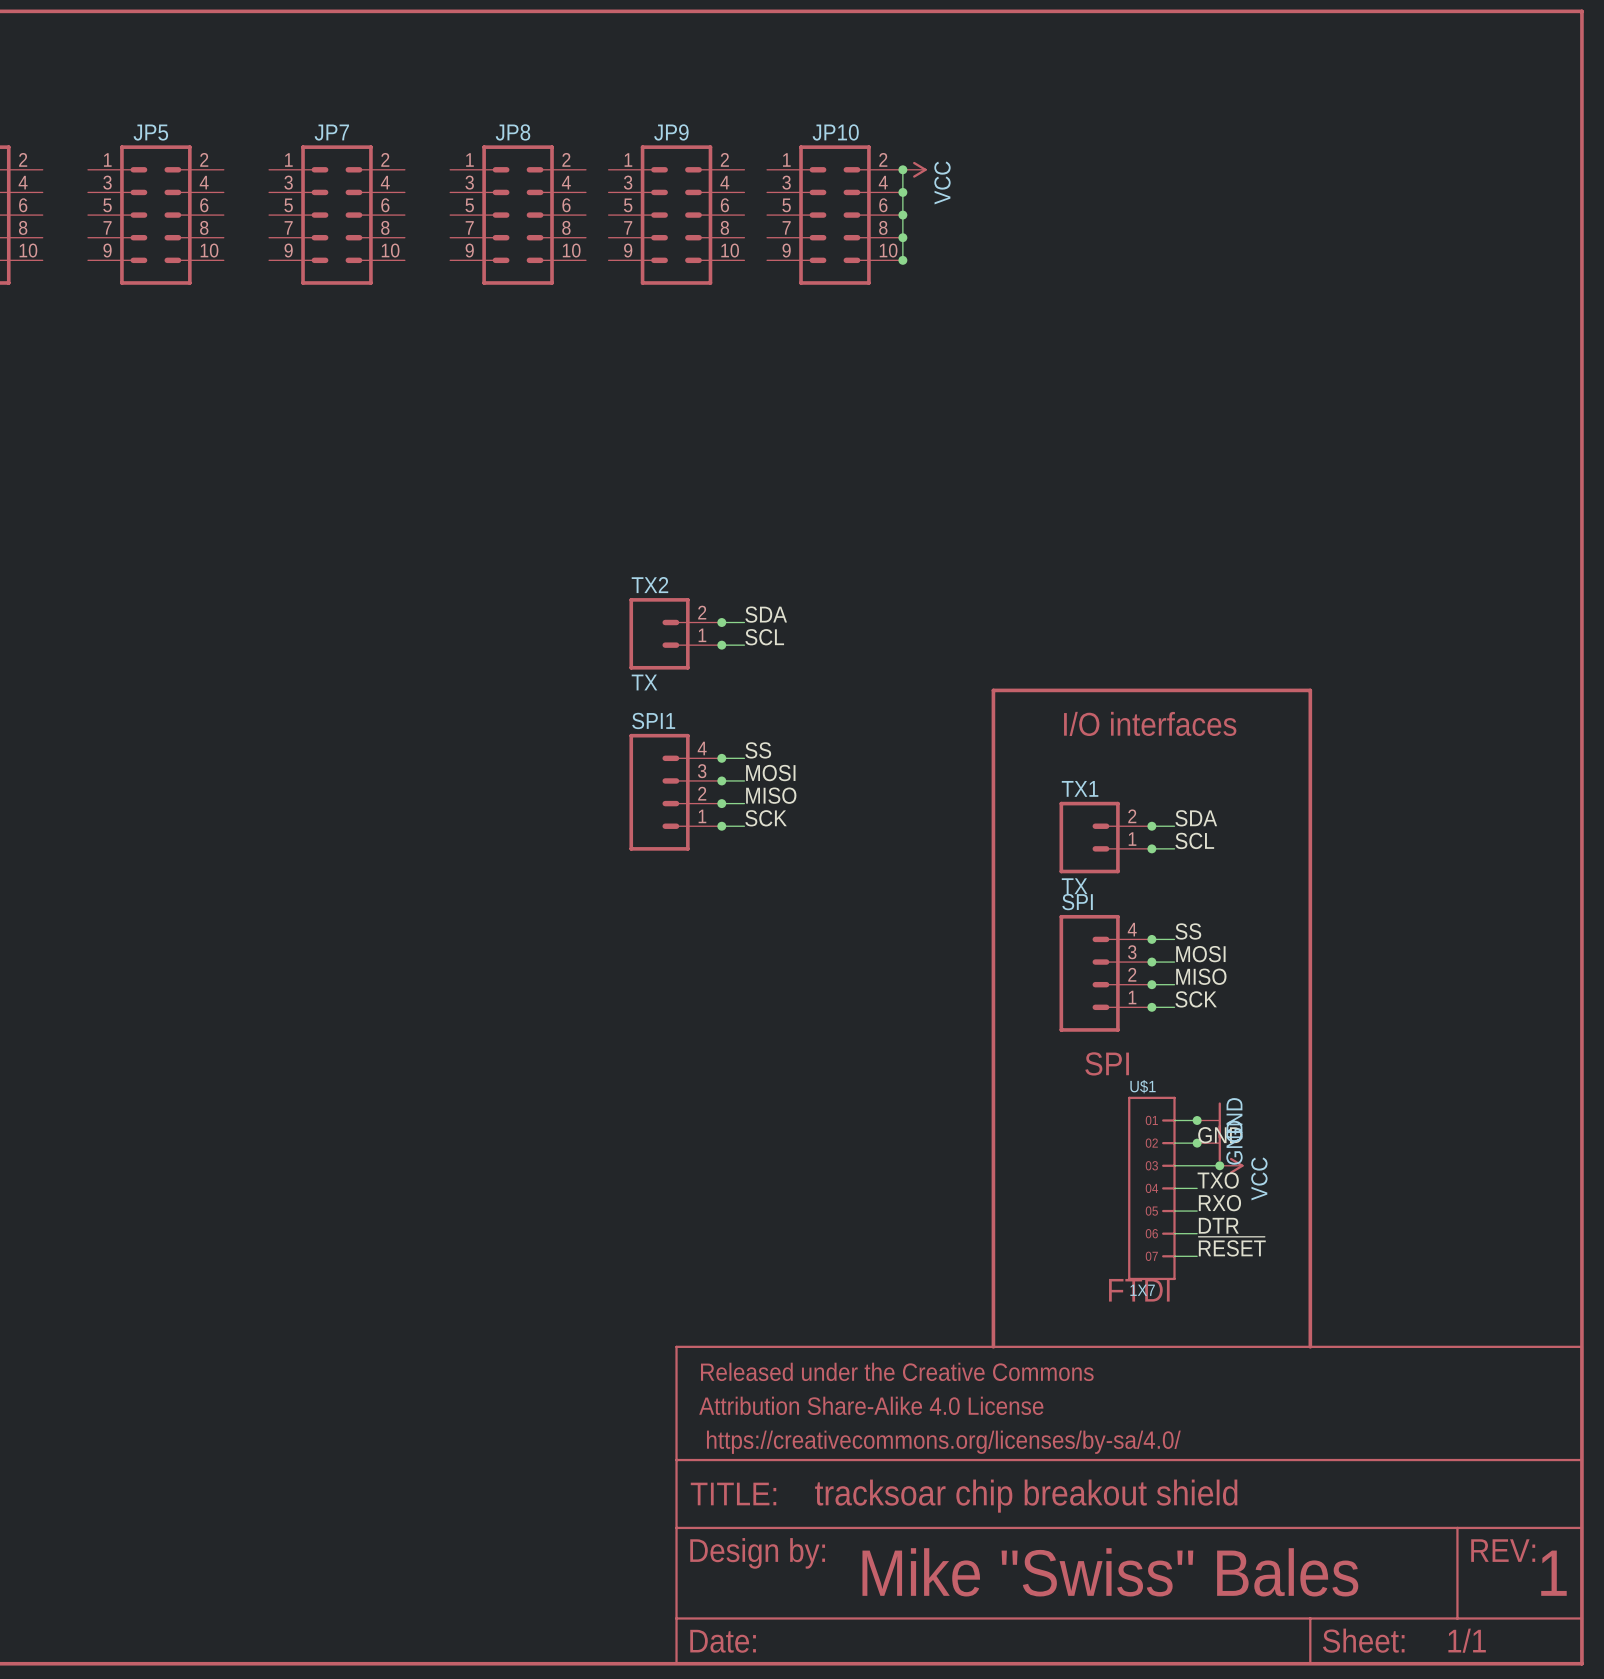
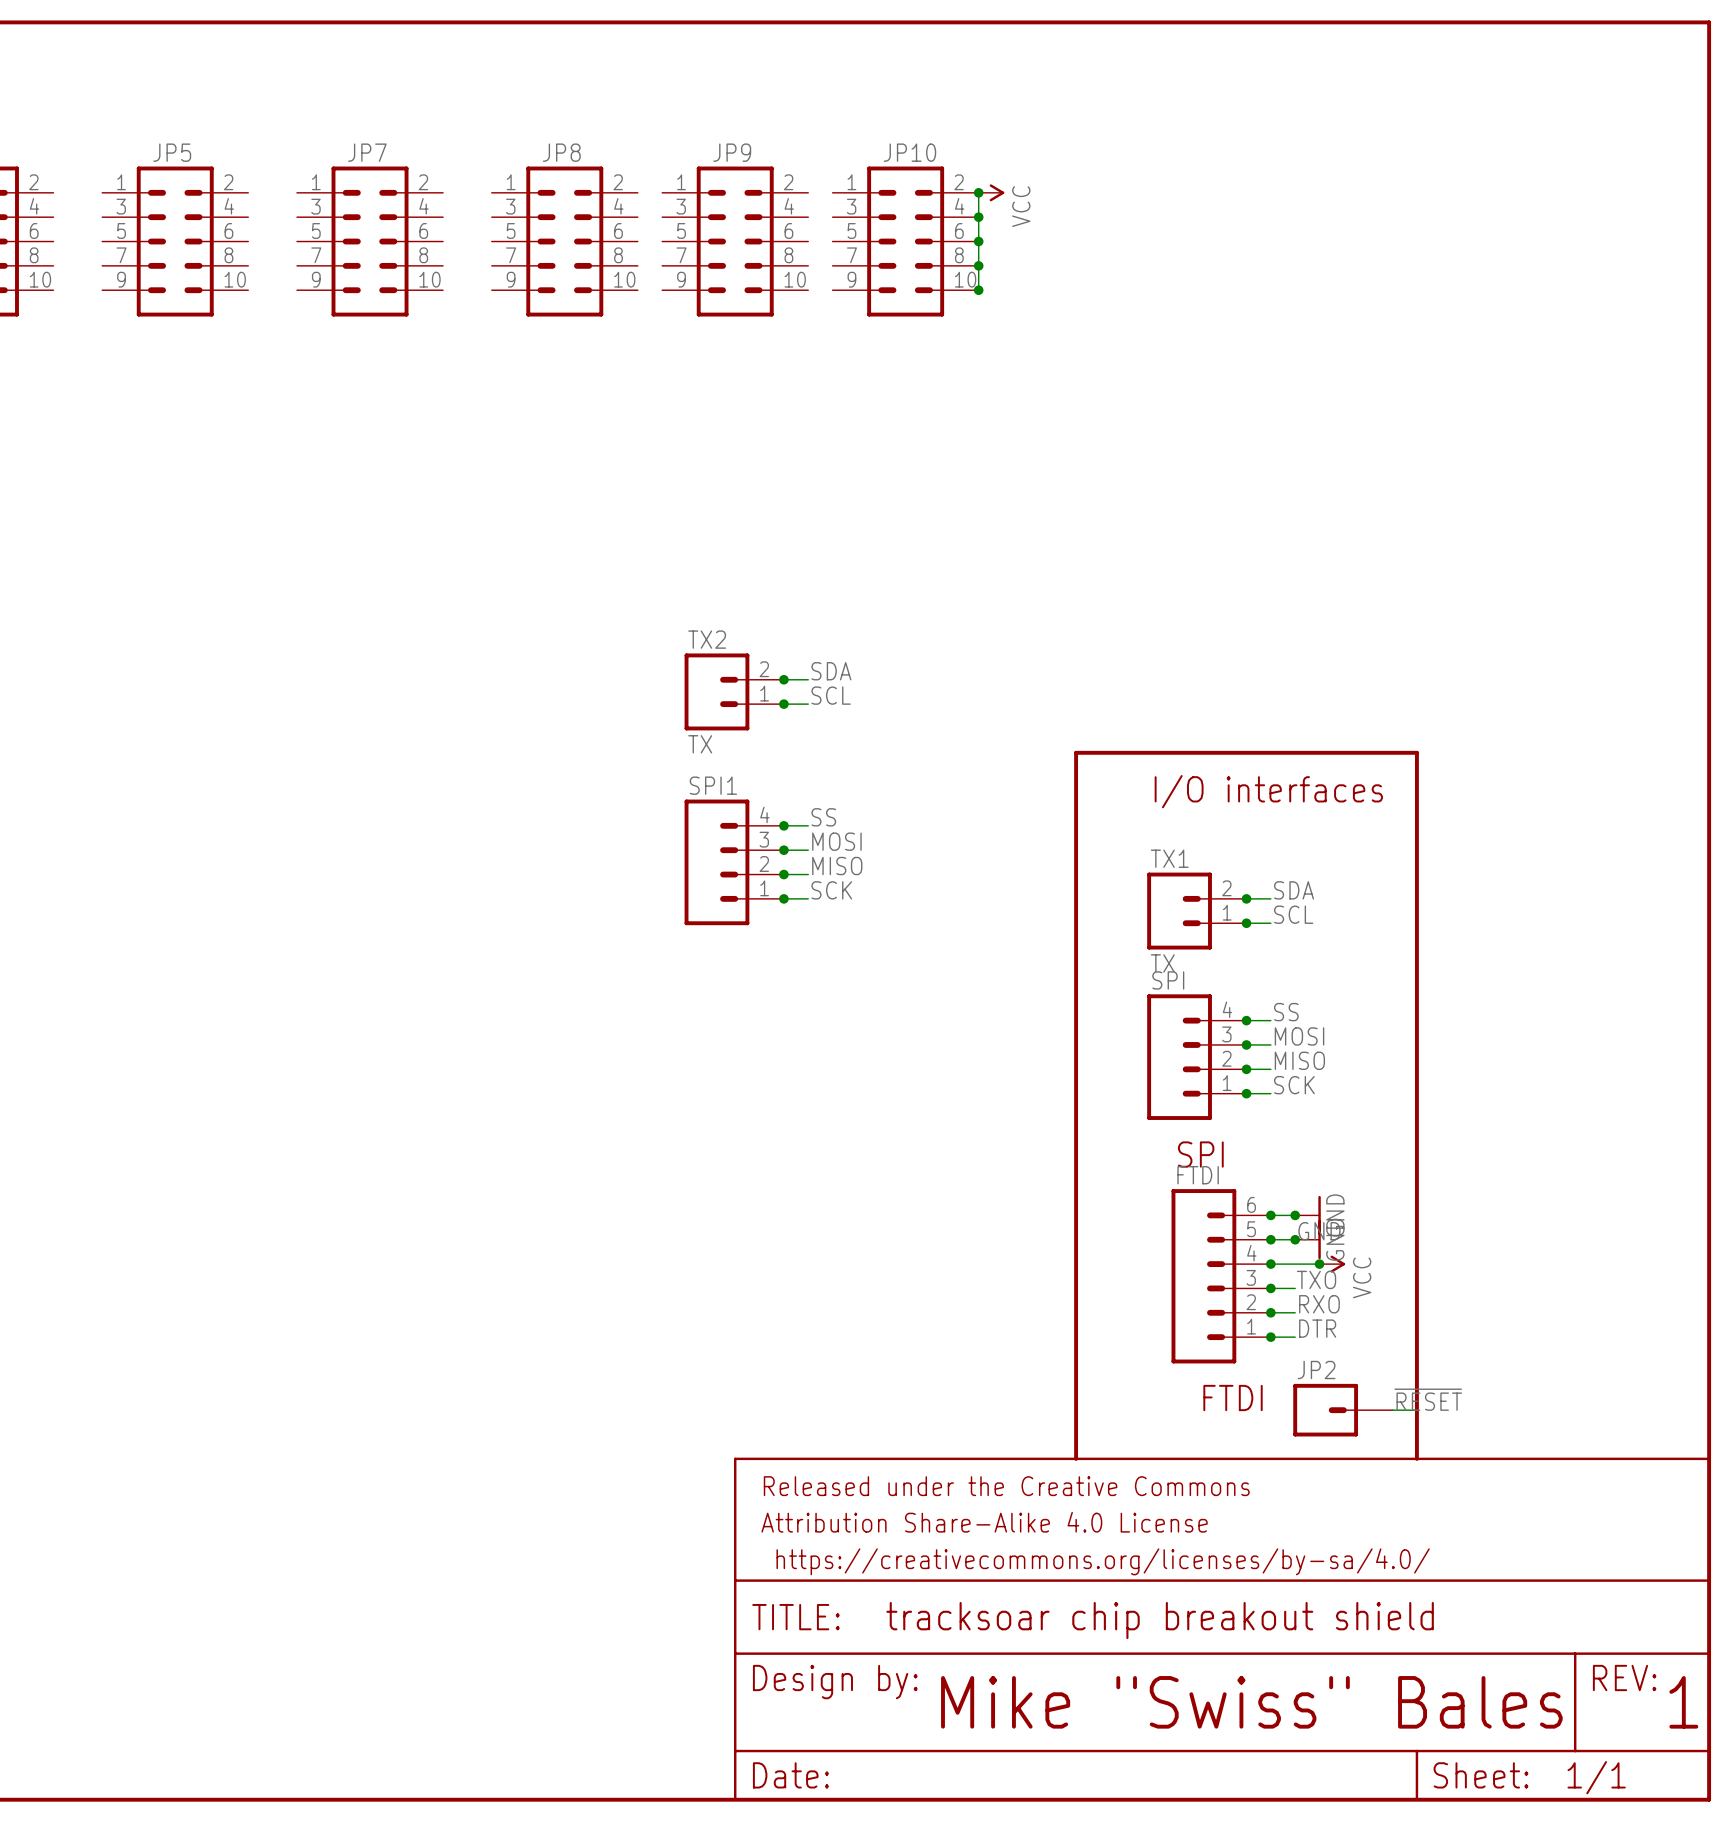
junction: none -> (1270, 1215)
junction: none -> (1270, 1239)
junction: none -> (1270, 1264)
FTDI: none -> (1221, 1276)
U$1: 1X7 (1151, 1188) -> none
junction: none -> (1270, 1288)
junction: none -> (1270, 1312)
junction: none -> (1270, 1337)
label position: ~{RESET} (1232, 1246) -> ~{RESET} (1428, 1399)
wire: (1174, 1256) (1197, 1256) -> (1392, 1410) (1416, 1410)
JP2: none -> (1342, 1410)

